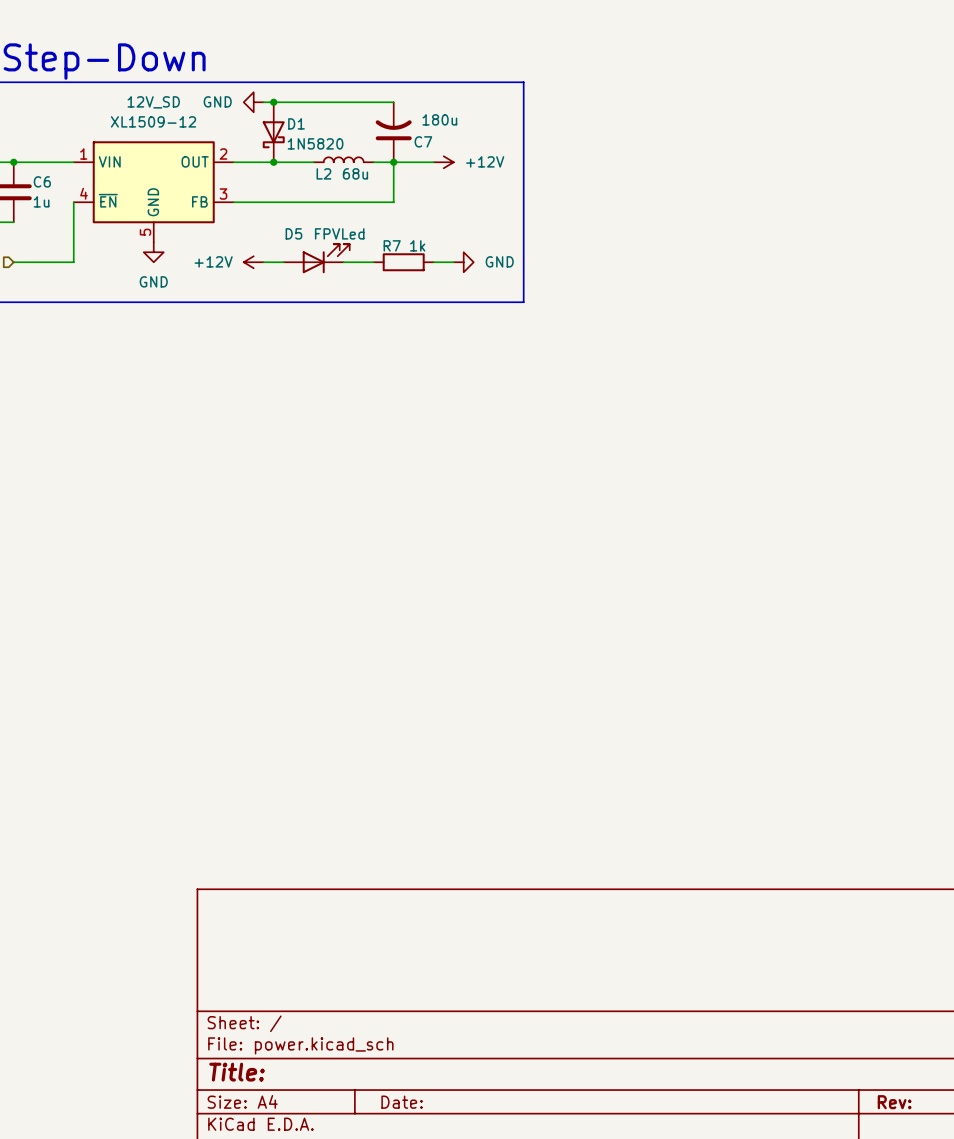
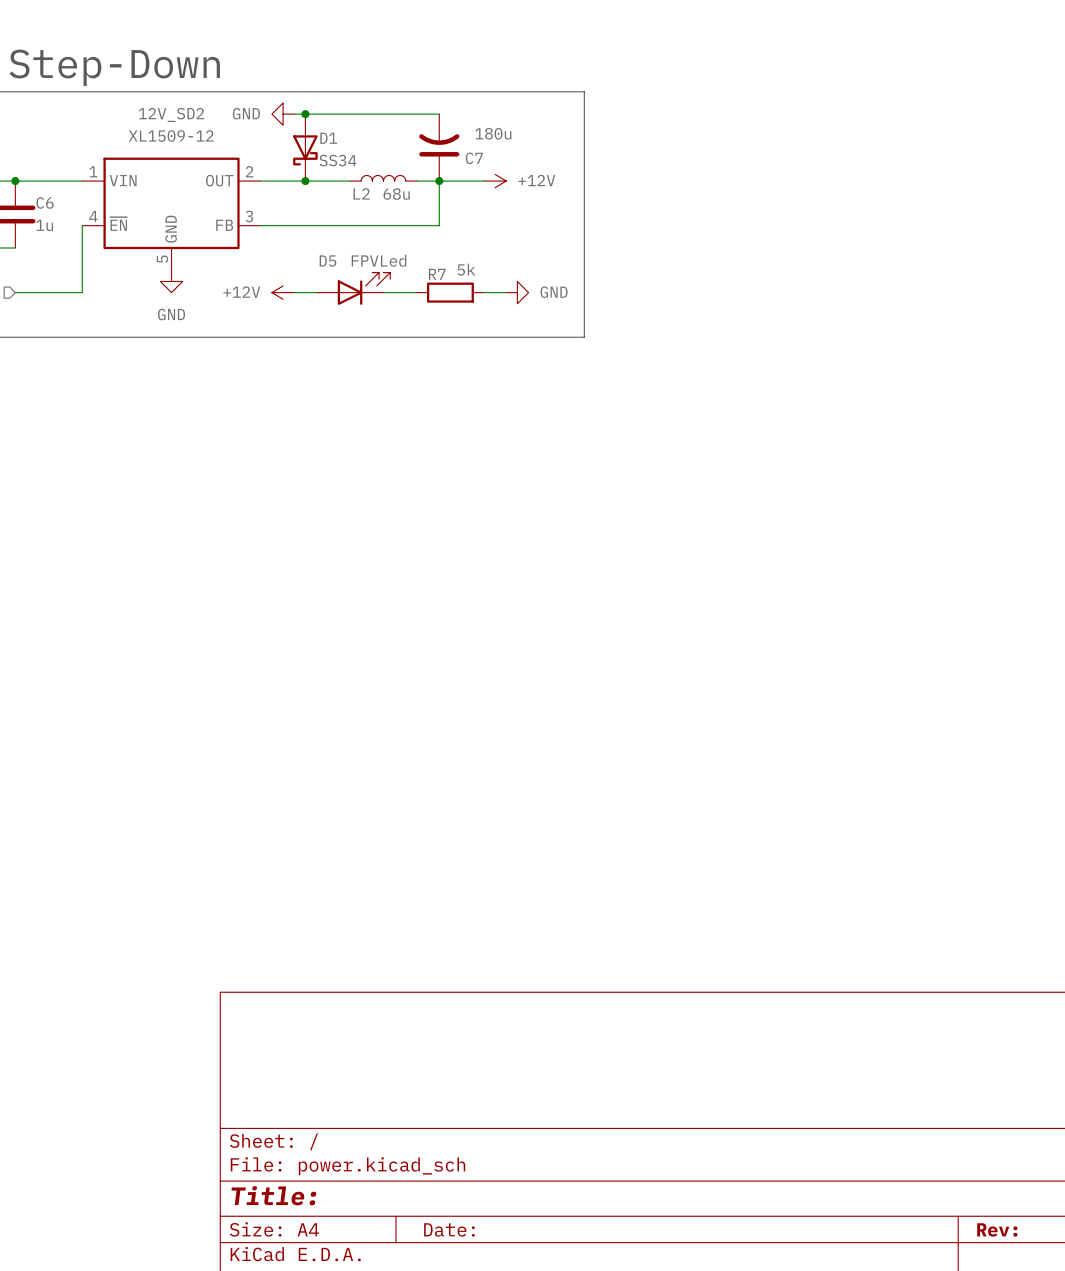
12V_SD name: 12V_SD (153, 102) -> 12V_SD2 (171, 114)
D1 value: 1N5820 (315, 143) -> SS34 (338, 160)
R7 value: 1k (417, 245) -> 5k (466, 269)

